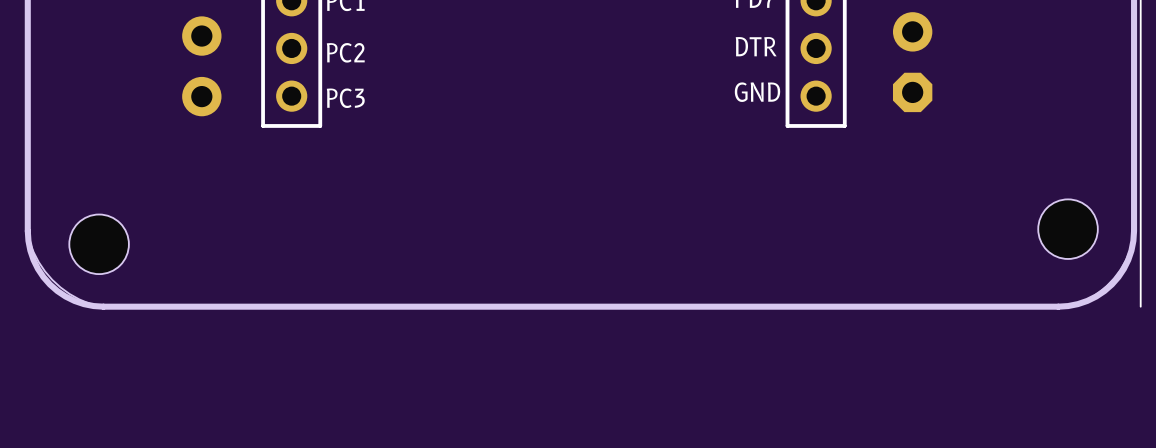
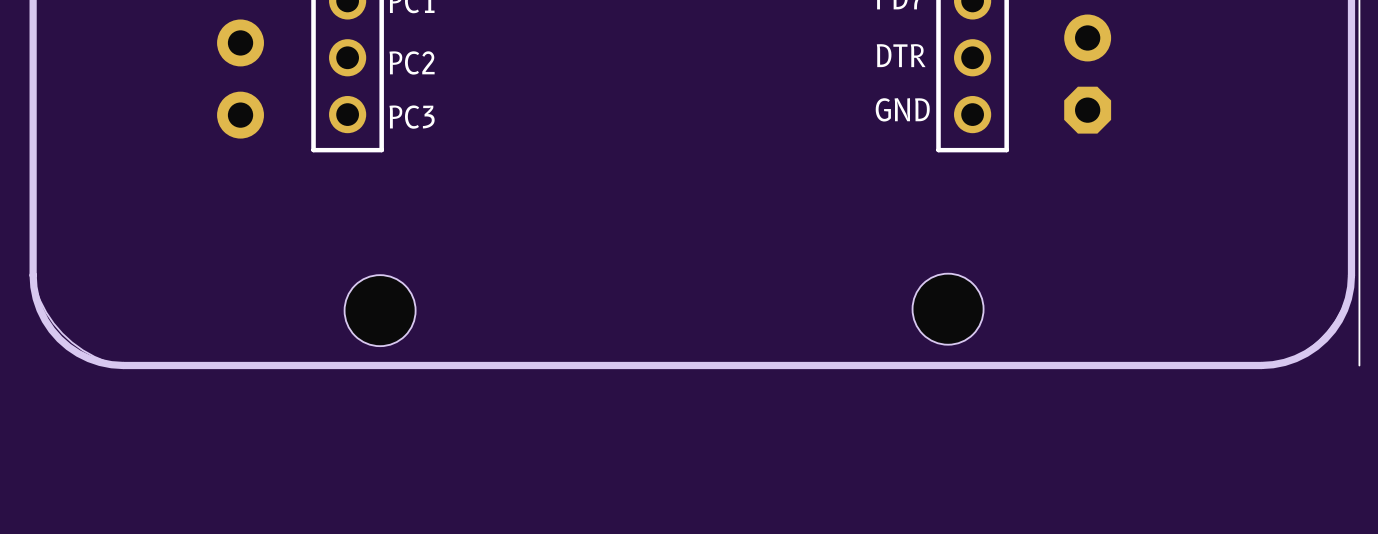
hole position: (1068, 229) -> (948, 309)
hole position: (99, 244) -> (380, 310)

